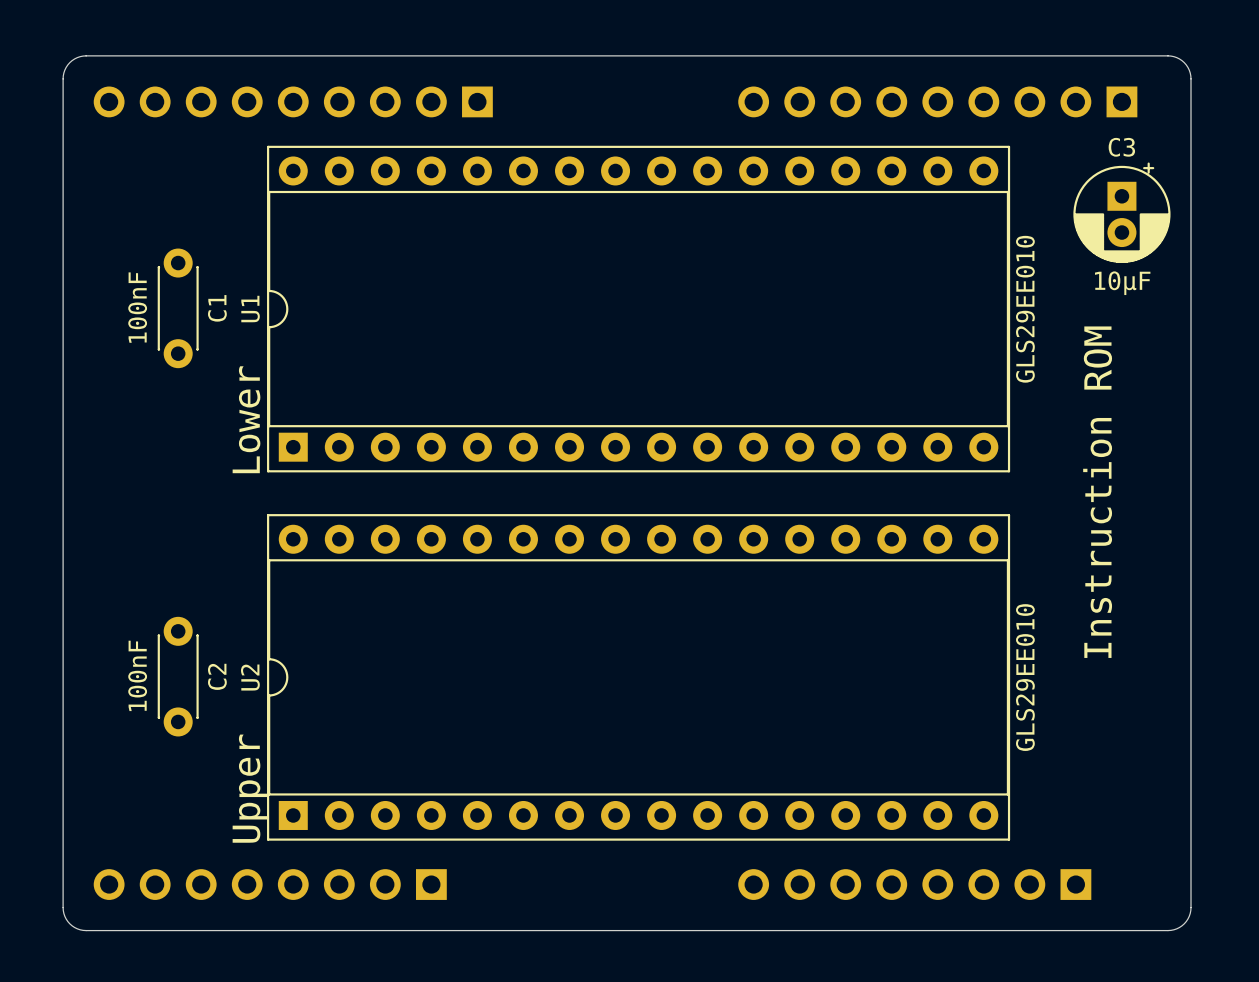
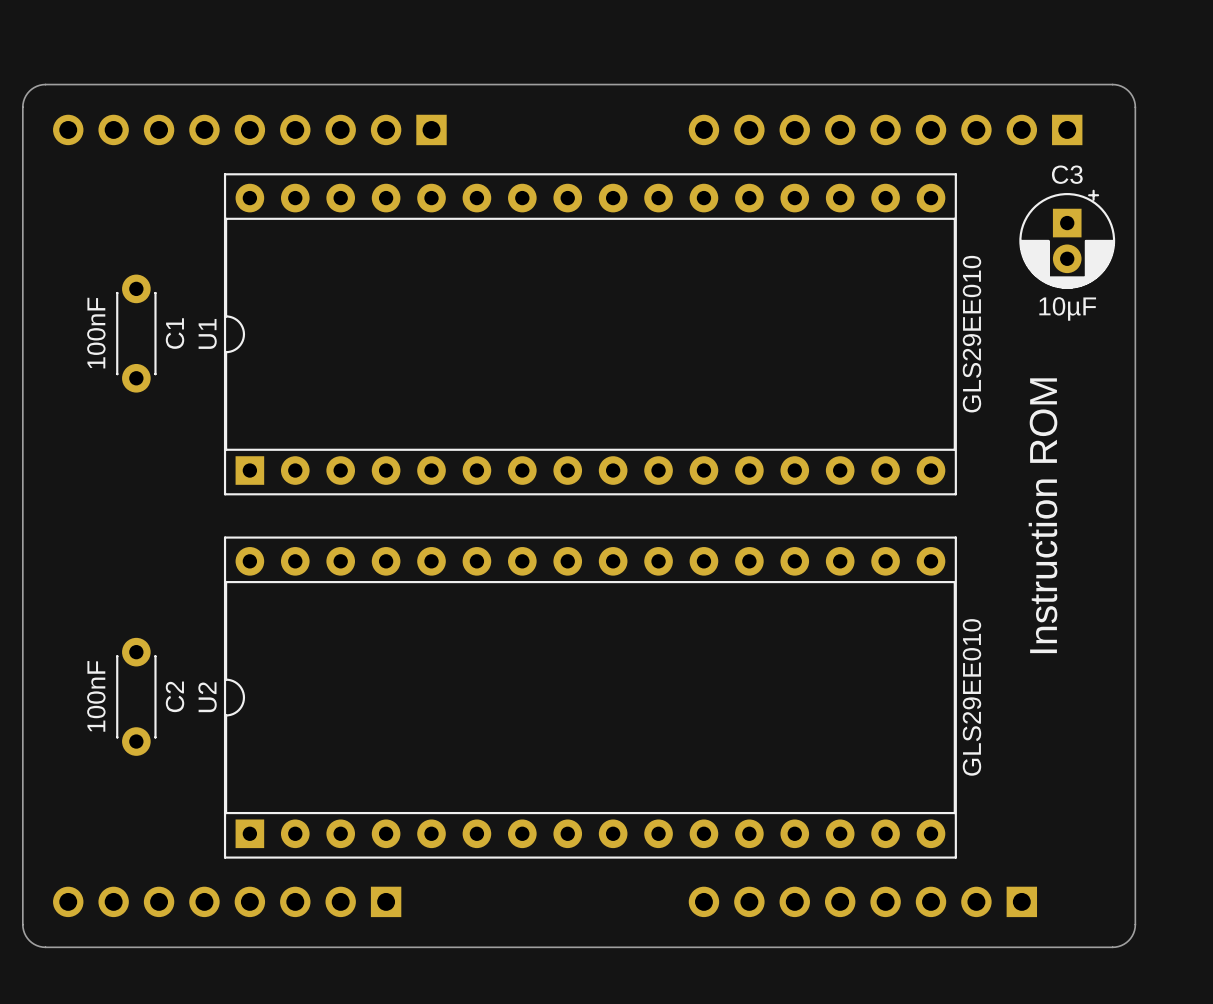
text: Lower (246, 419) -> none
text: Upper (250, 788) -> none

